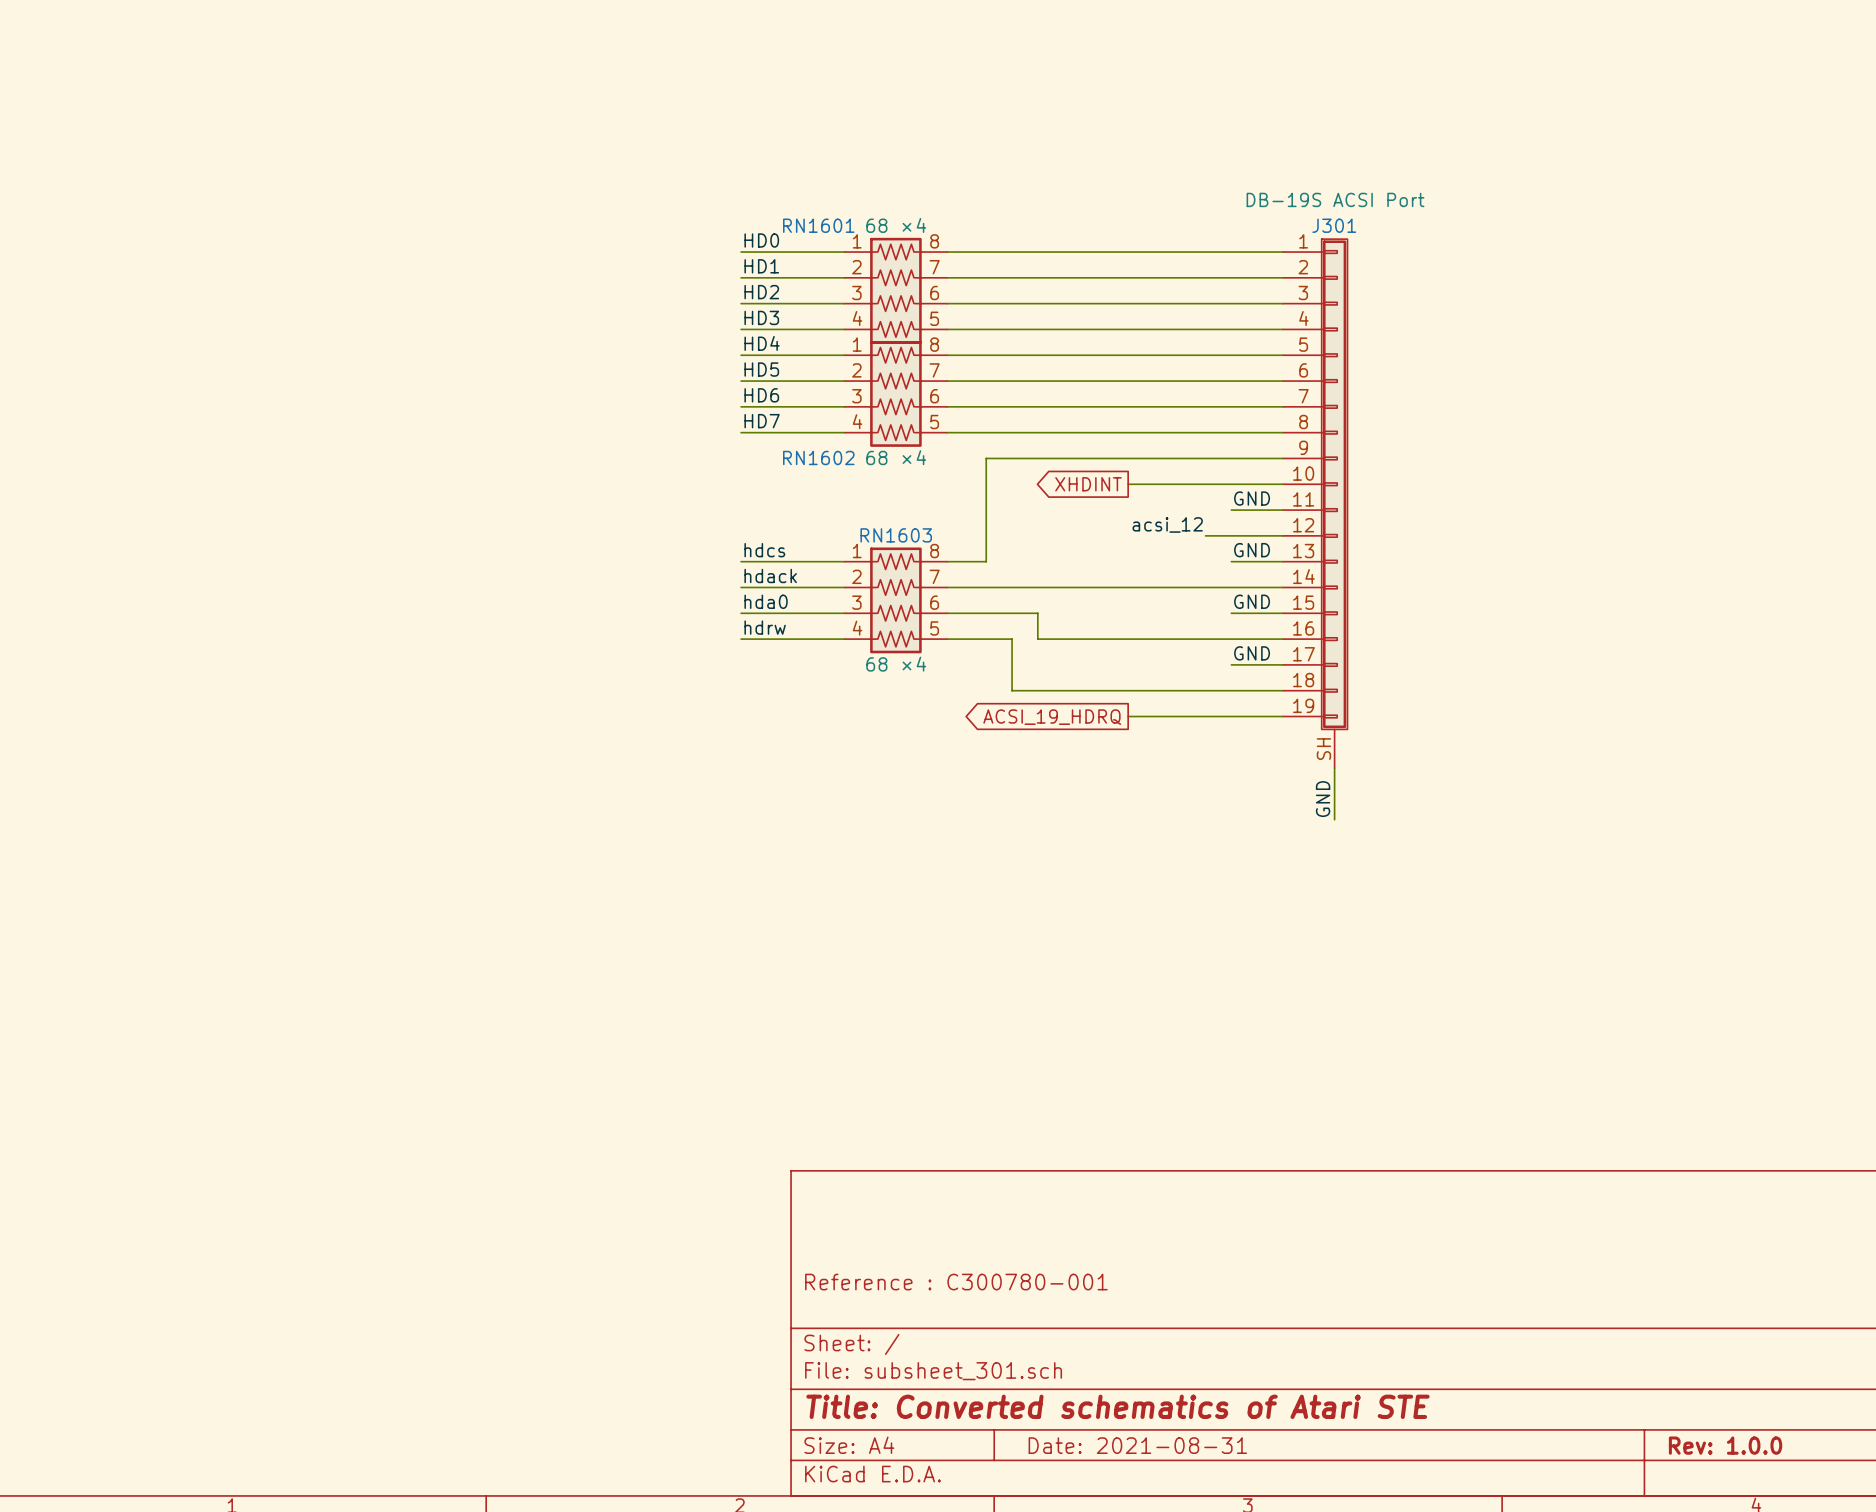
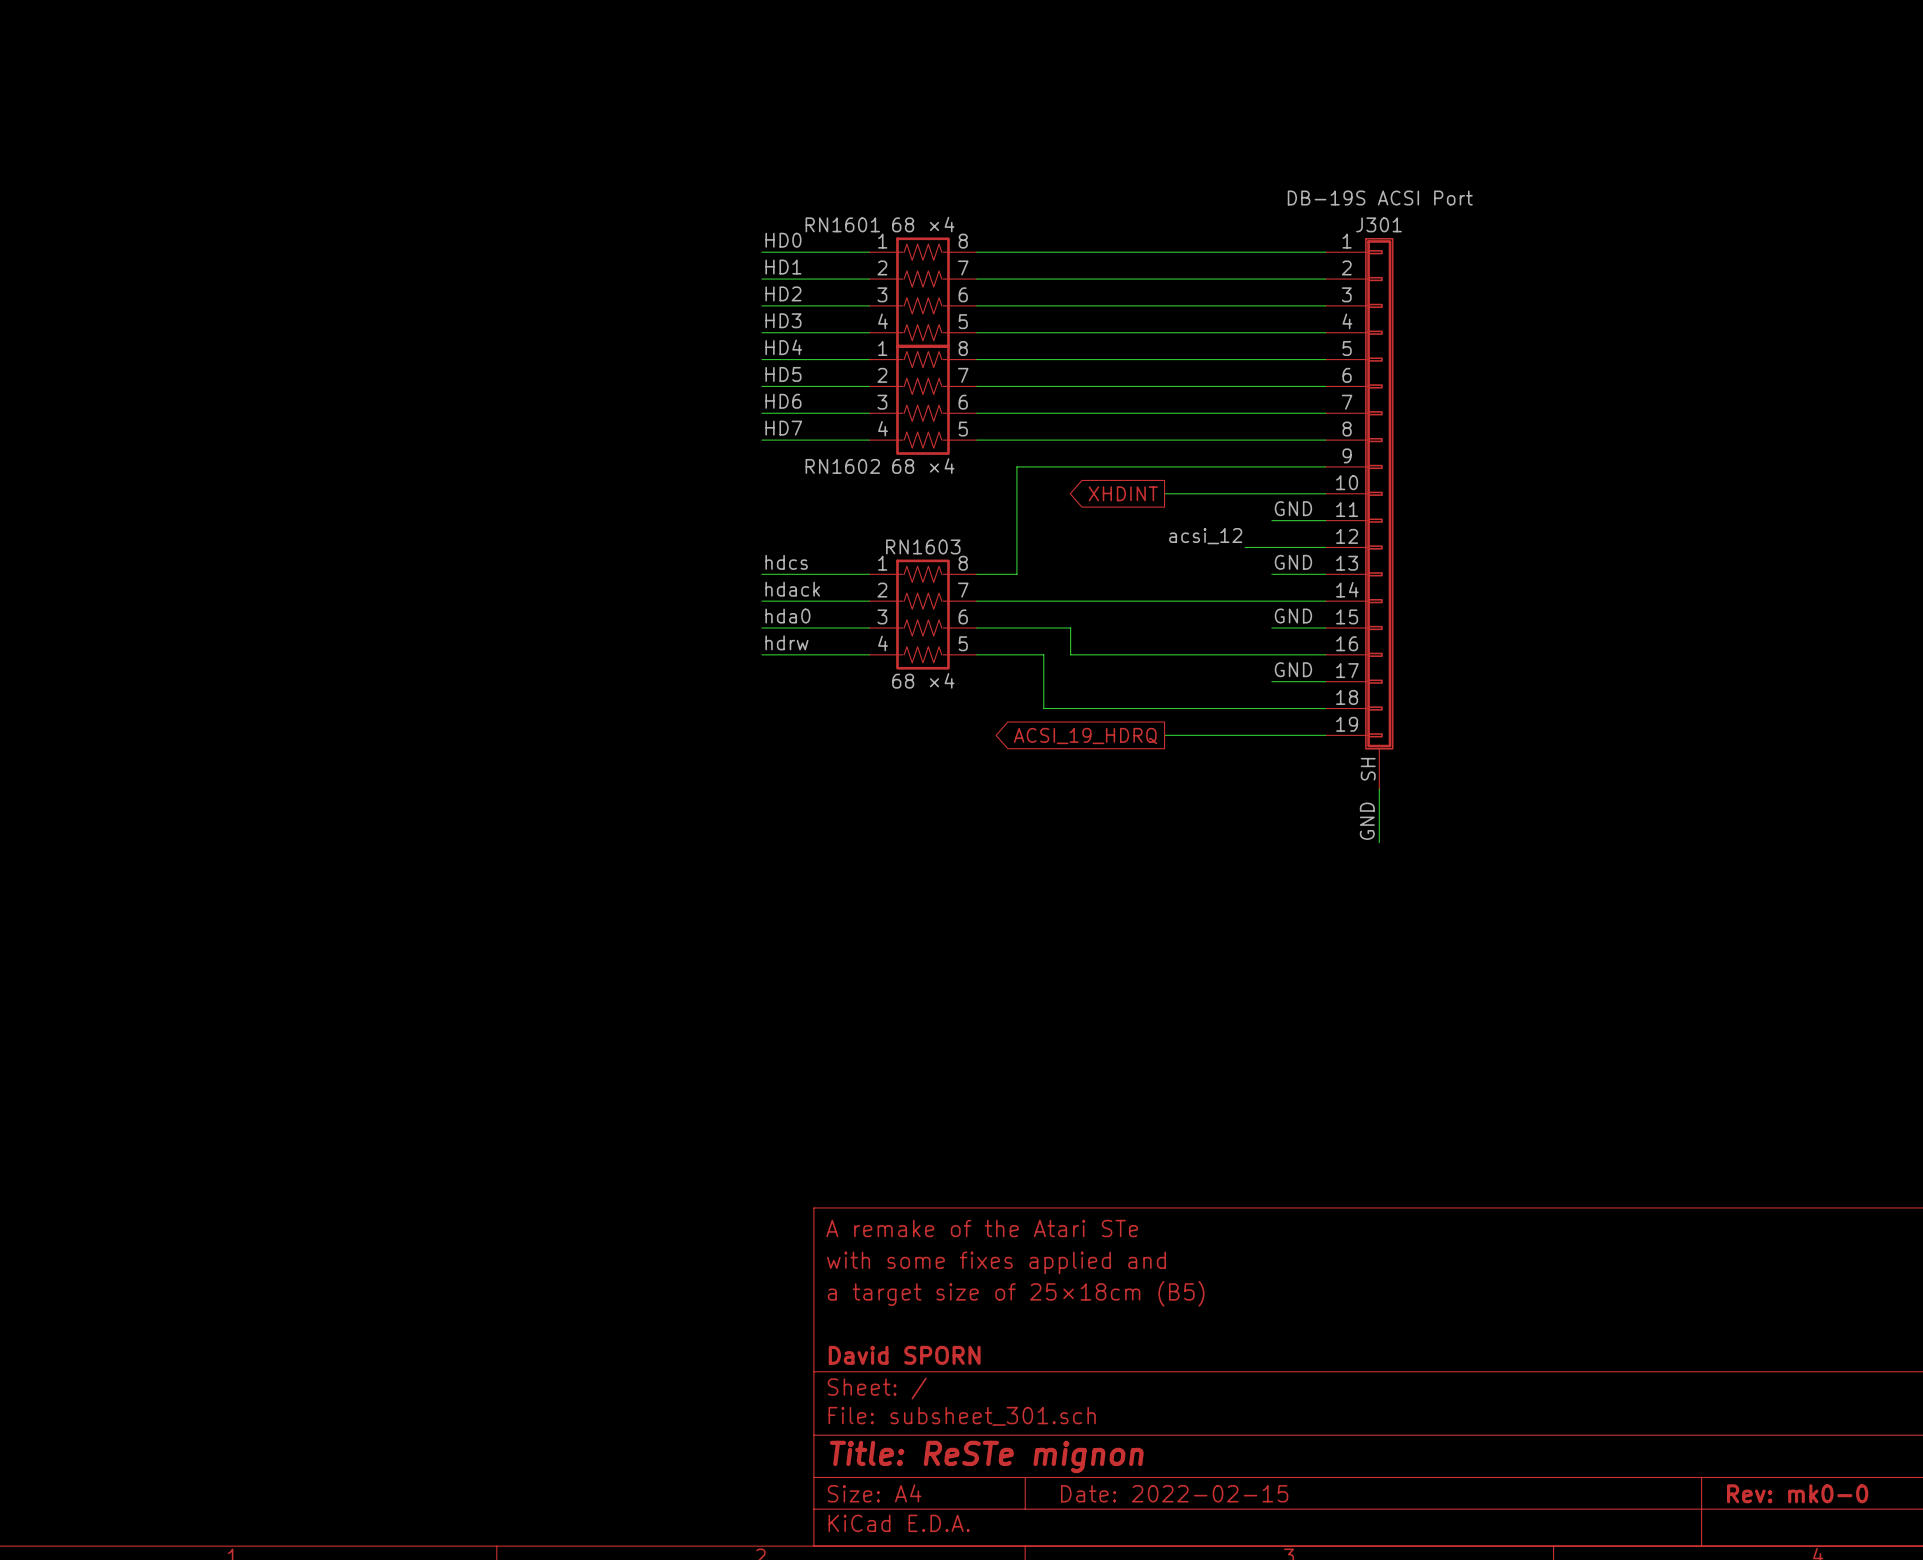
title block: none -> A remake of the Atari STe (982, 1228)
title block: none -> with some fixes applied and (996, 1262)
title block: none -> a target size of 25×18cm (B5) (1016, 1293)
title block: Reference : C300780-001 (956, 1282) -> none
title block: none -> David SPORN (904, 1355)
title block: Title: Converted schematics of Atari STE (1117, 1406) -> Title: ReSTe mignon (986, 1456)
title block: Date: 2021-08-31 (1137, 1445) -> Date: 2022-02-15 (1174, 1493)
title block: Rev: 1.0.0 (1725, 1445) -> Rev: mk0-0 (1797, 1493)

